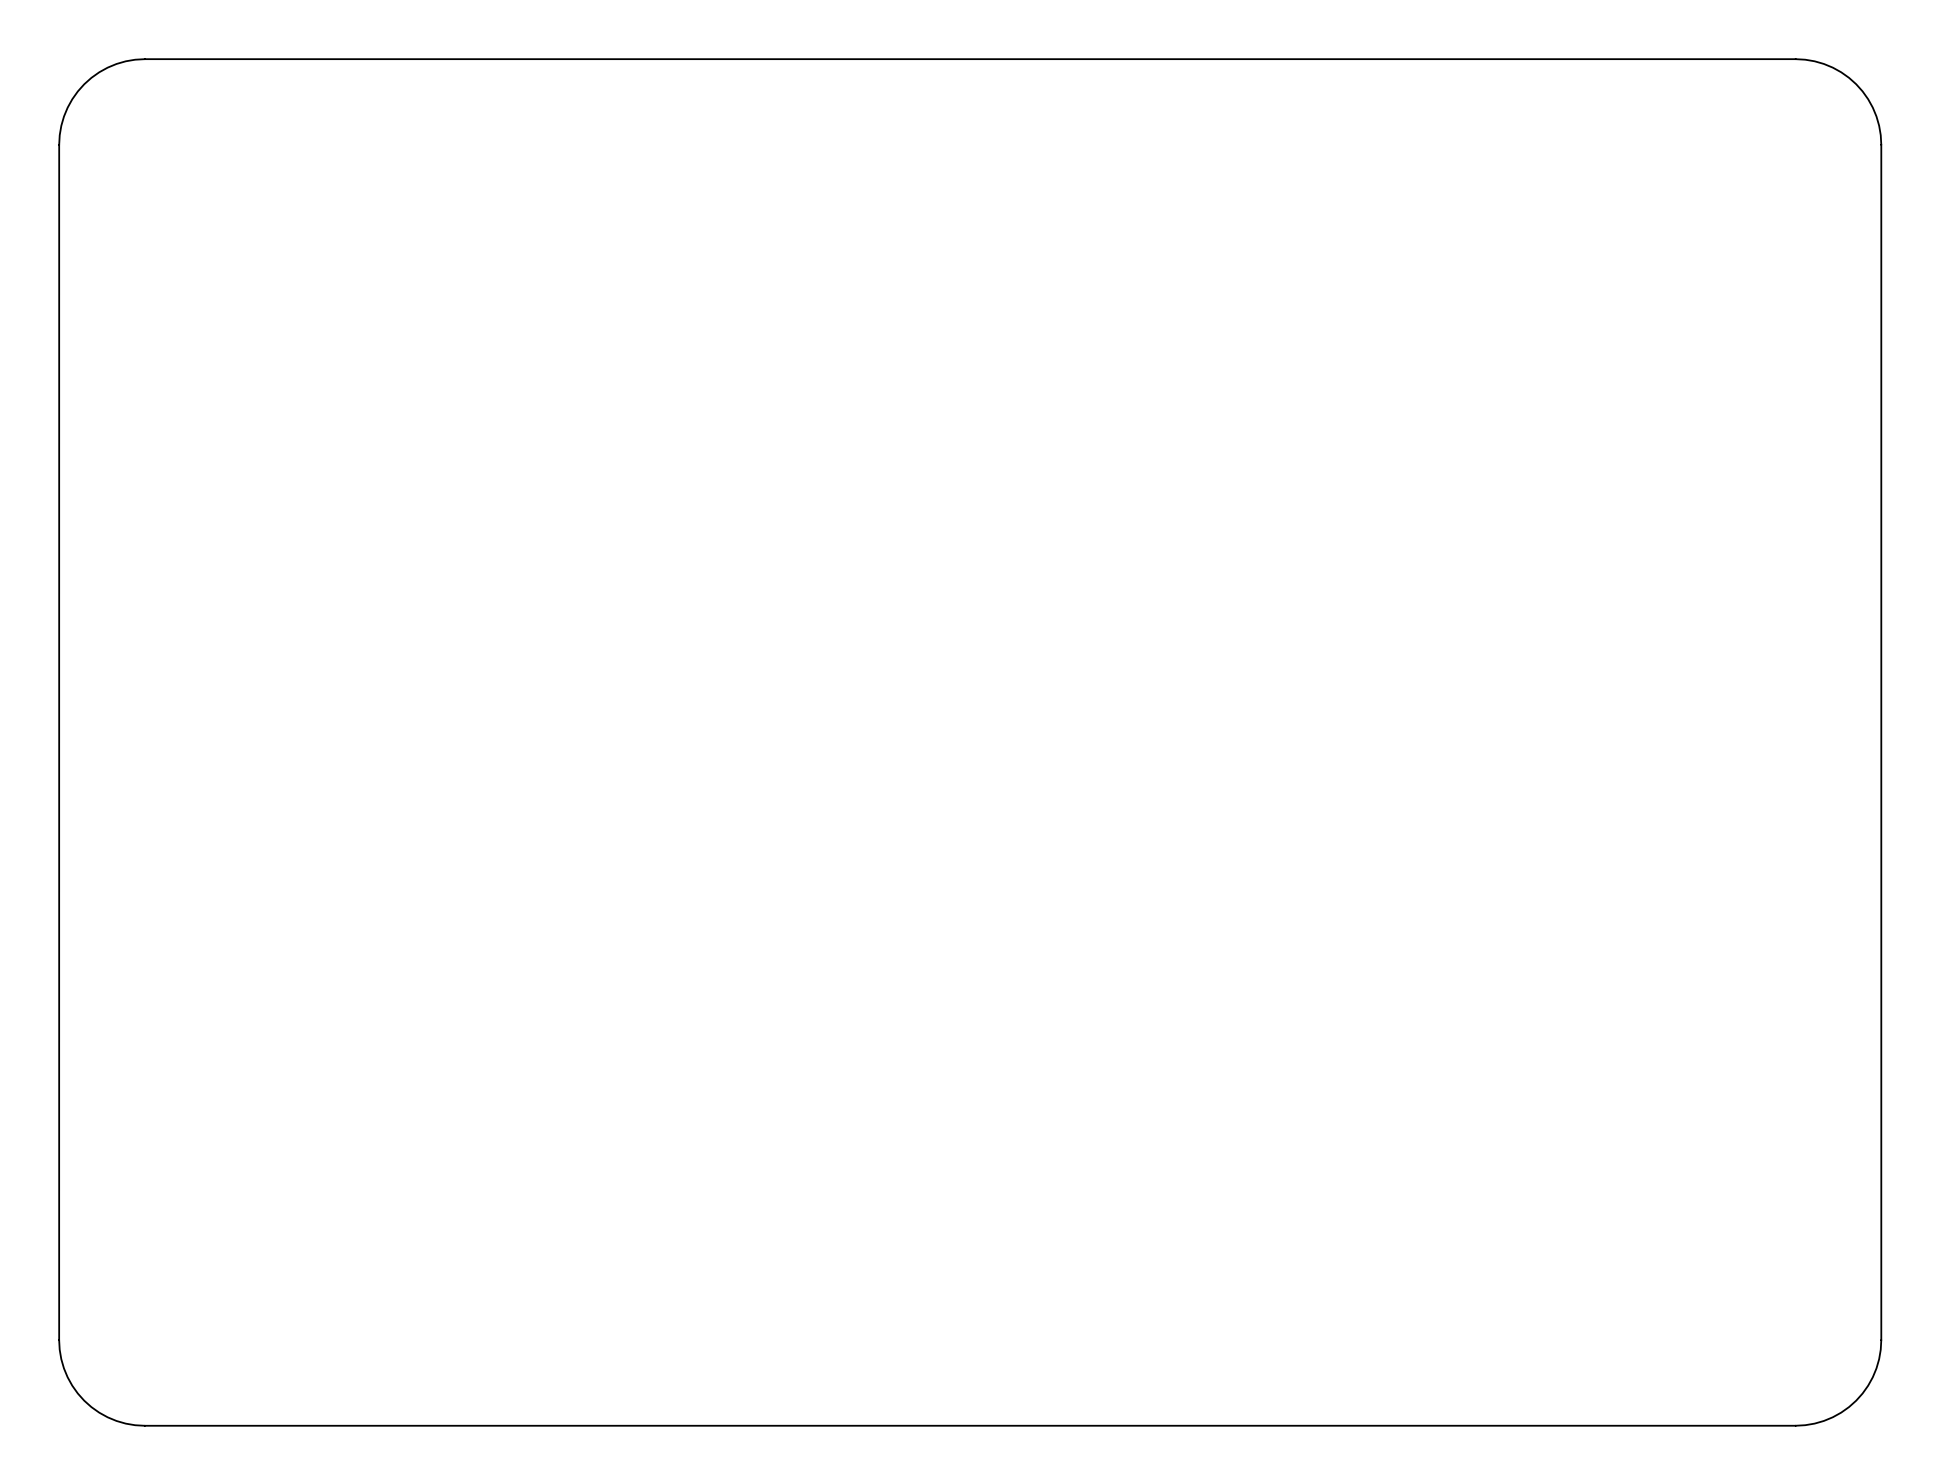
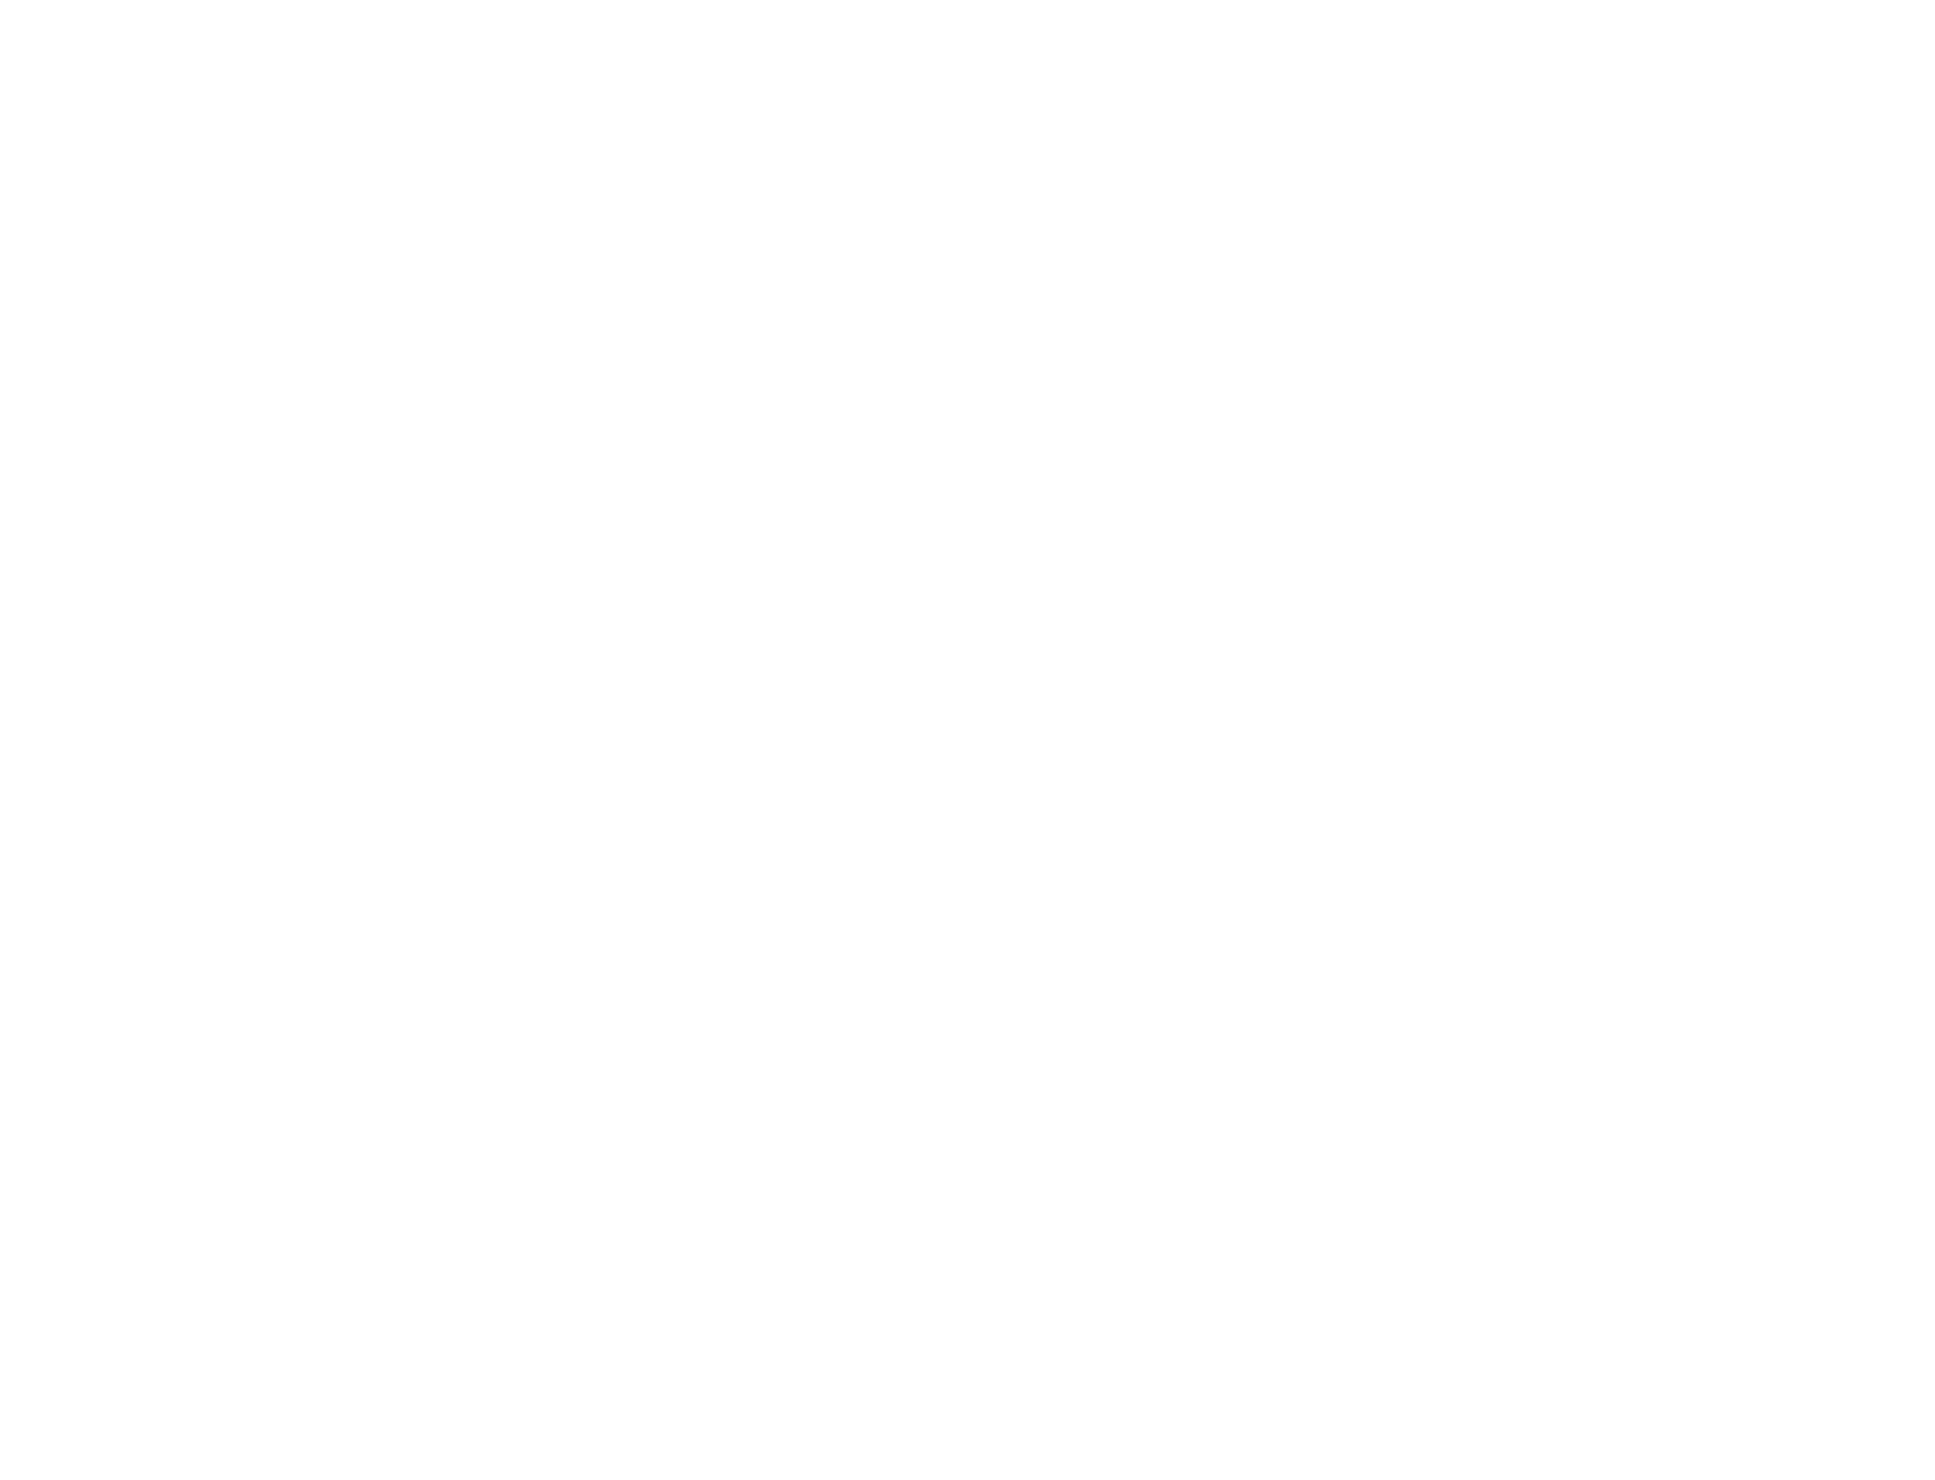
board edge: (1795, 59) (144, 59) (116, 63) (91, 77) (77, 91) (67, 107) (61, 125) (59, 144) (59, 1340) (63, 1368) (77, 1393) (91, 1407) (107, 1417) (125, 1423) (144, 1425) (1795, 1425) (1823, 1420) (1849, 1407) (1862, 1393) (1872, 1377) (1879, 1359) (1881, 1340) (1881, 144) (1876, 116) (1868, 99) (1856, 84) (1841, 72) (1823, 63) (1795, 59) -> none

